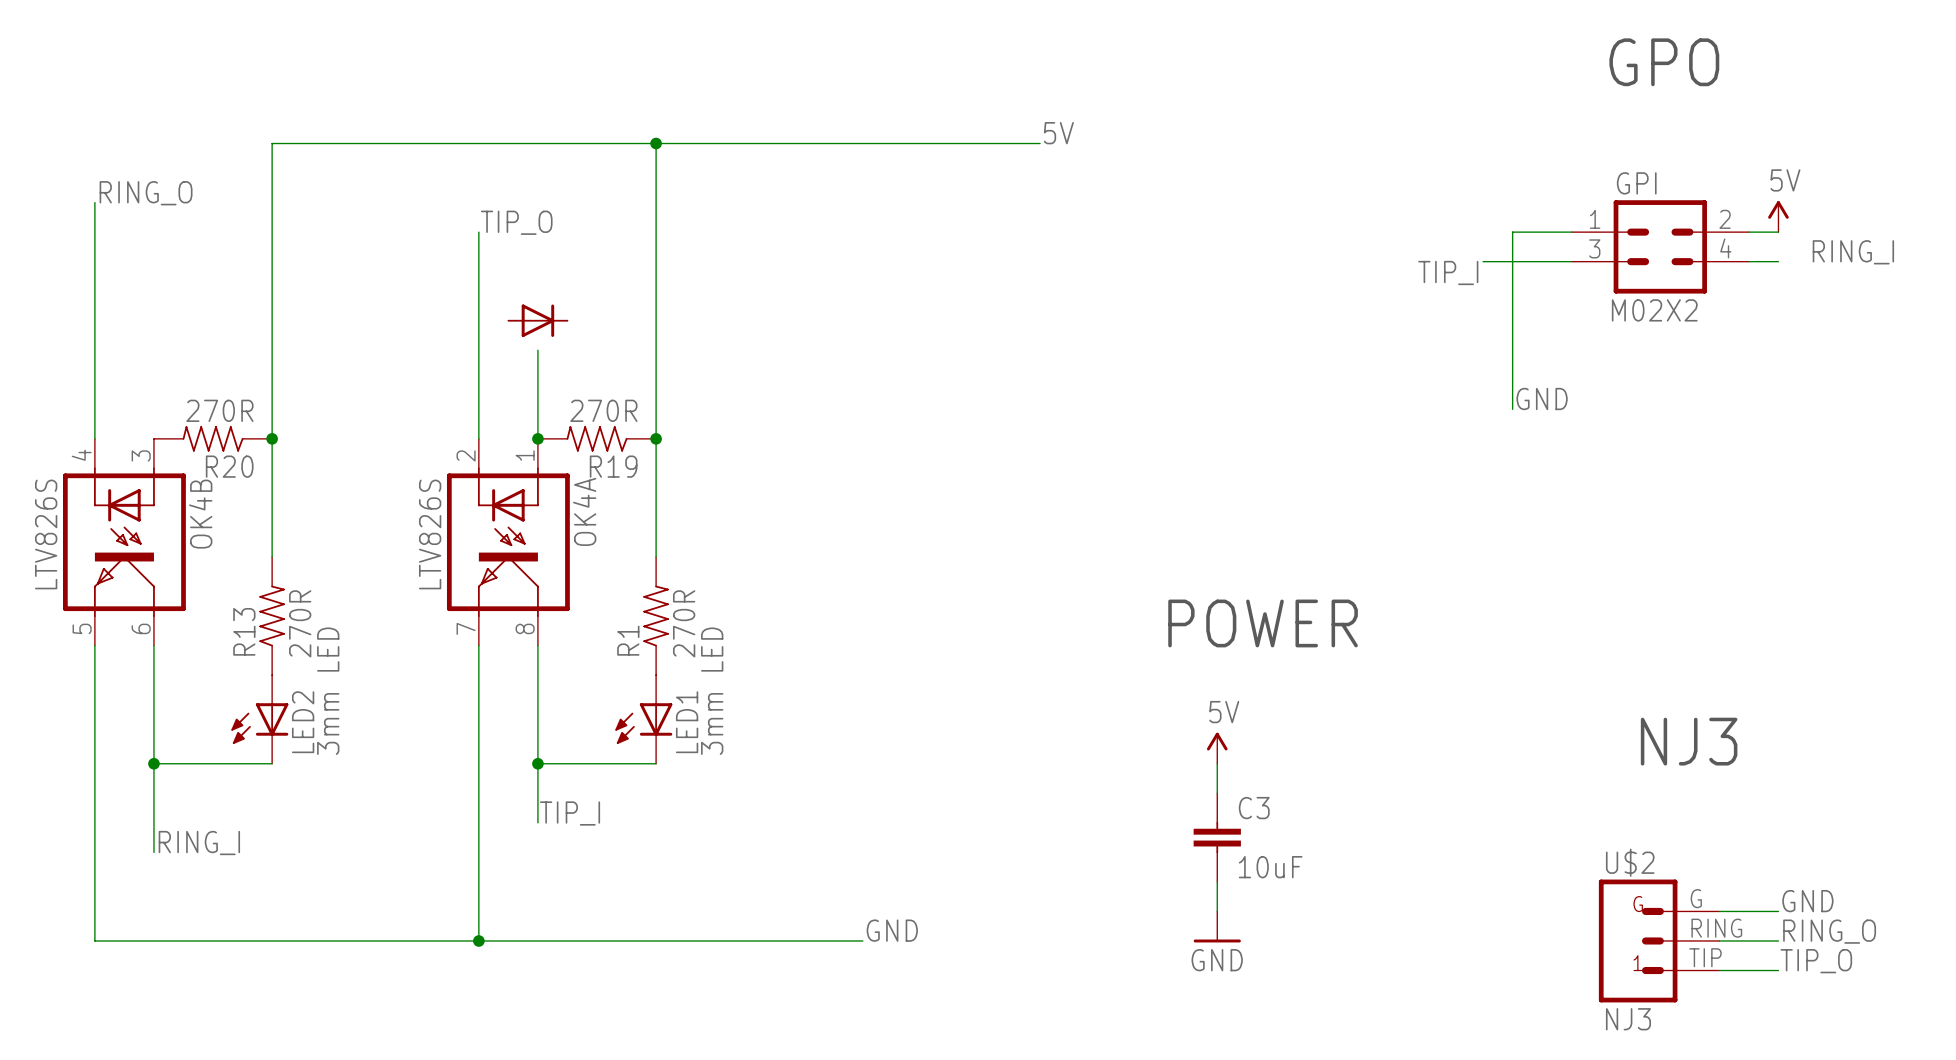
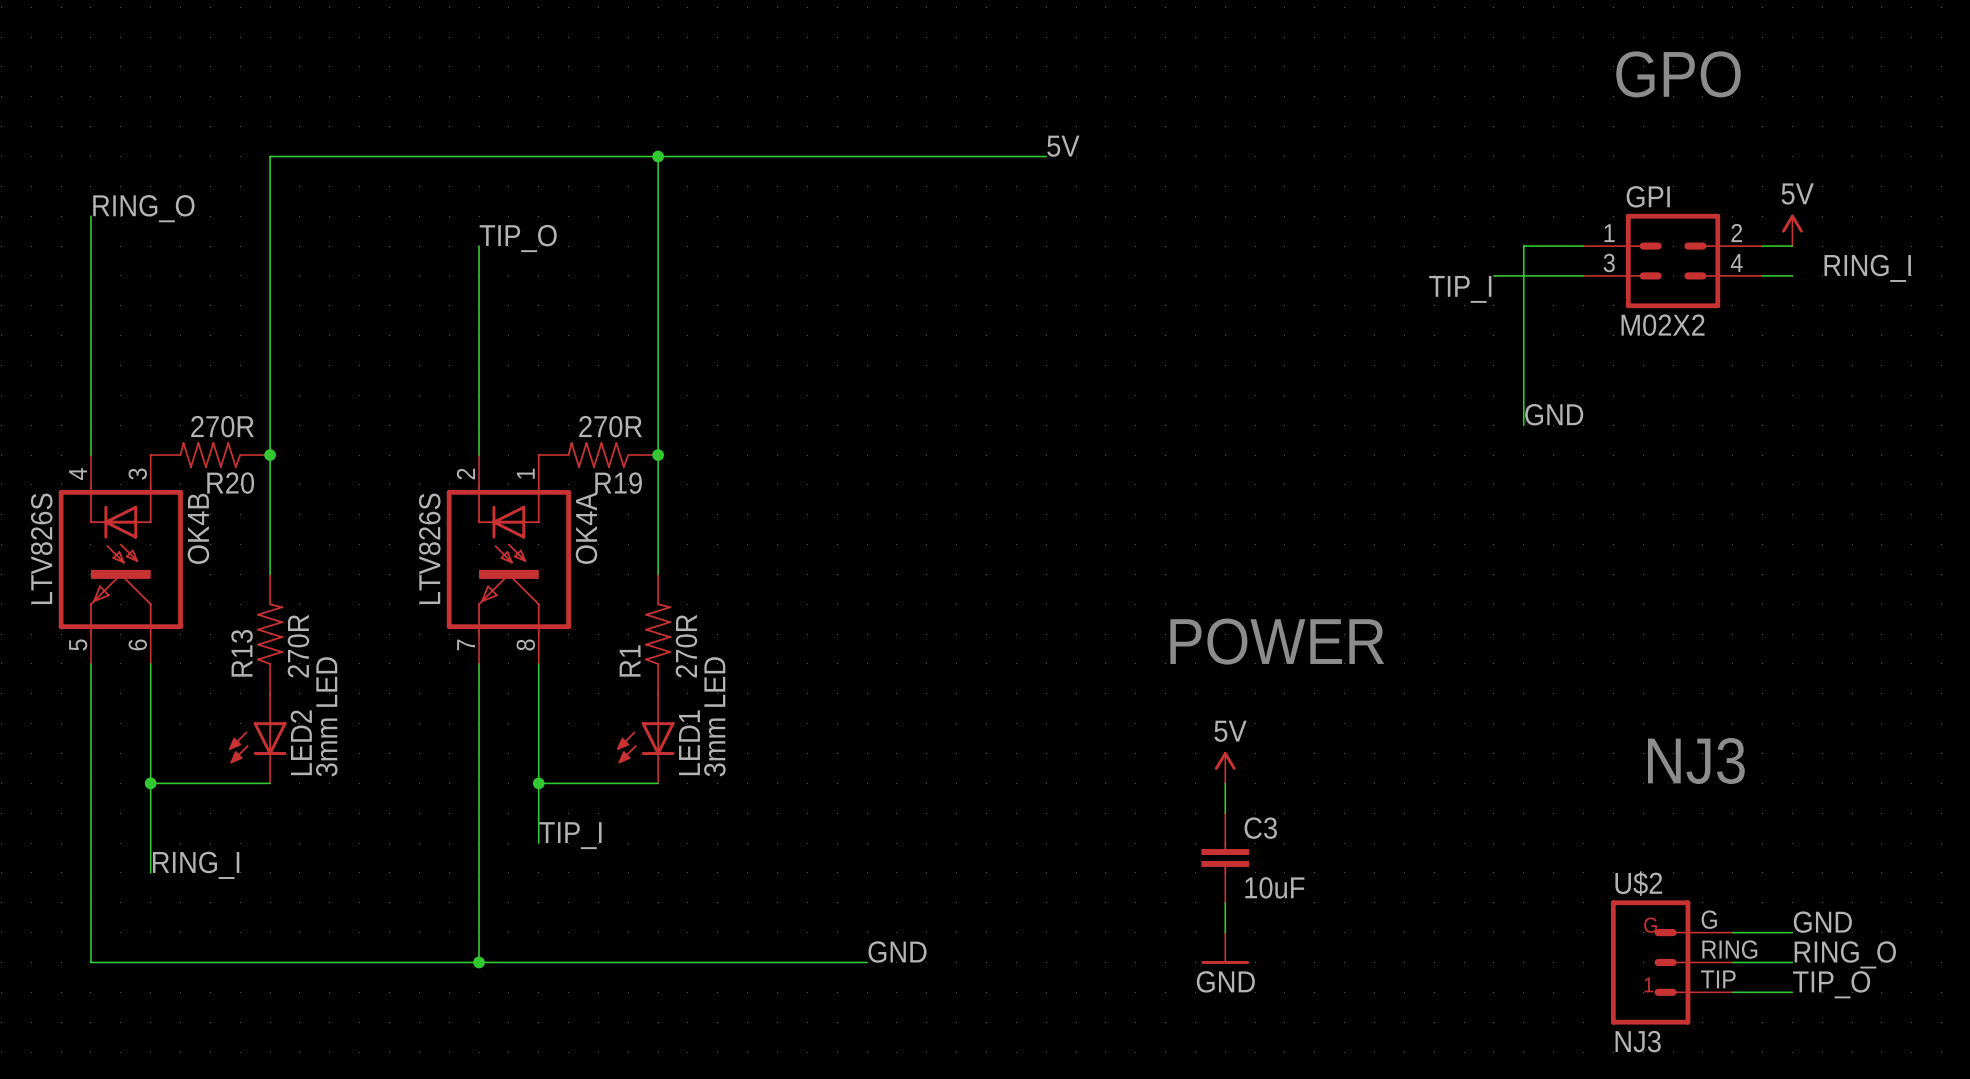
part: (537, 320) -> none
wire: (537, 350) (537, 438) -> none
junction: (537, 438) -> none

